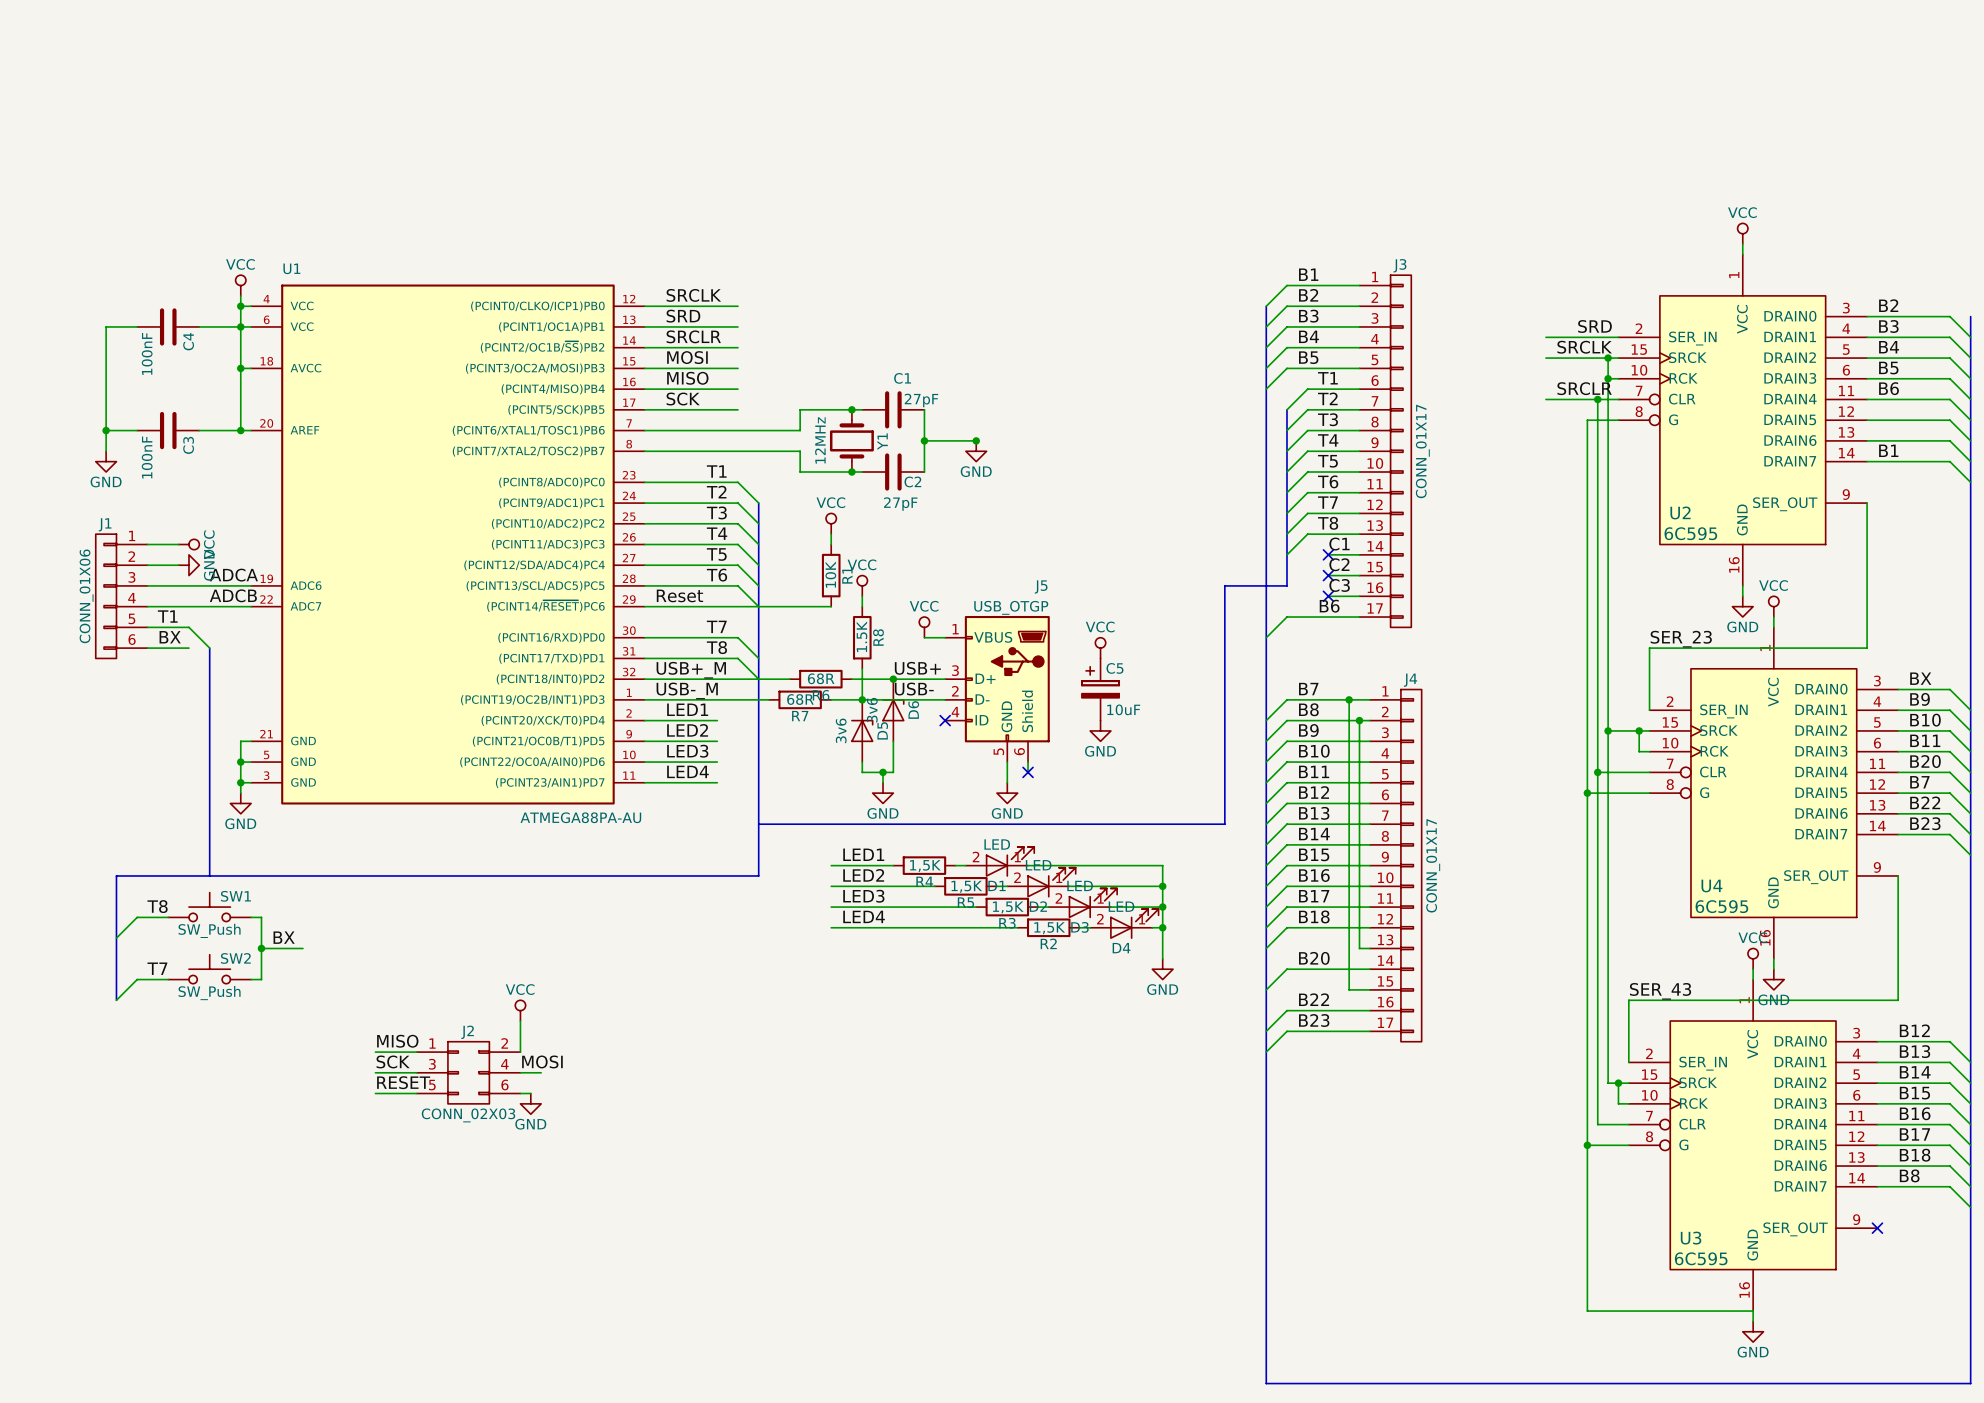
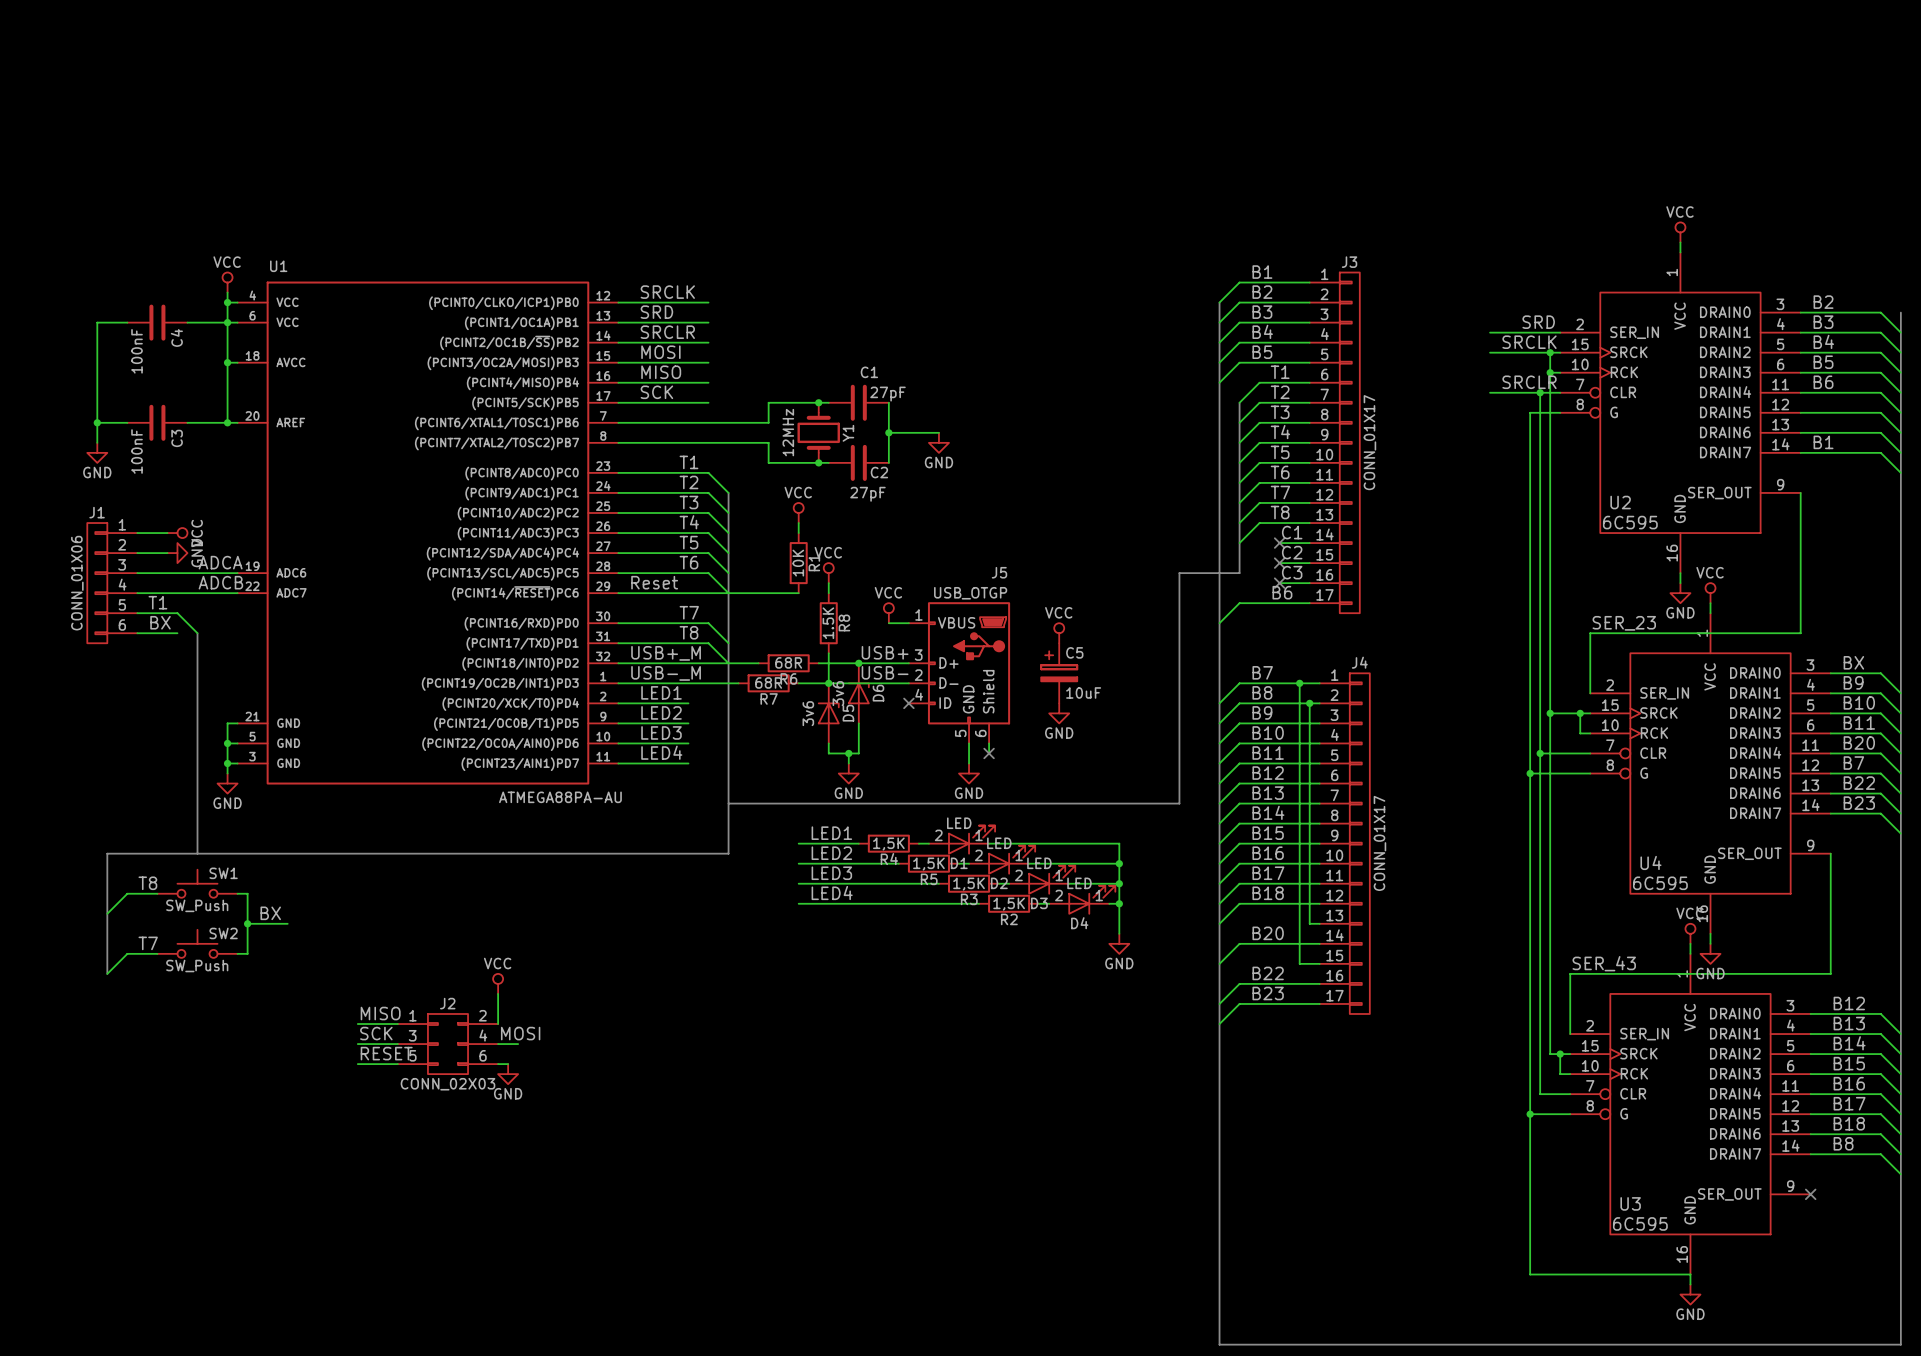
junction: (976, 440) -> none

